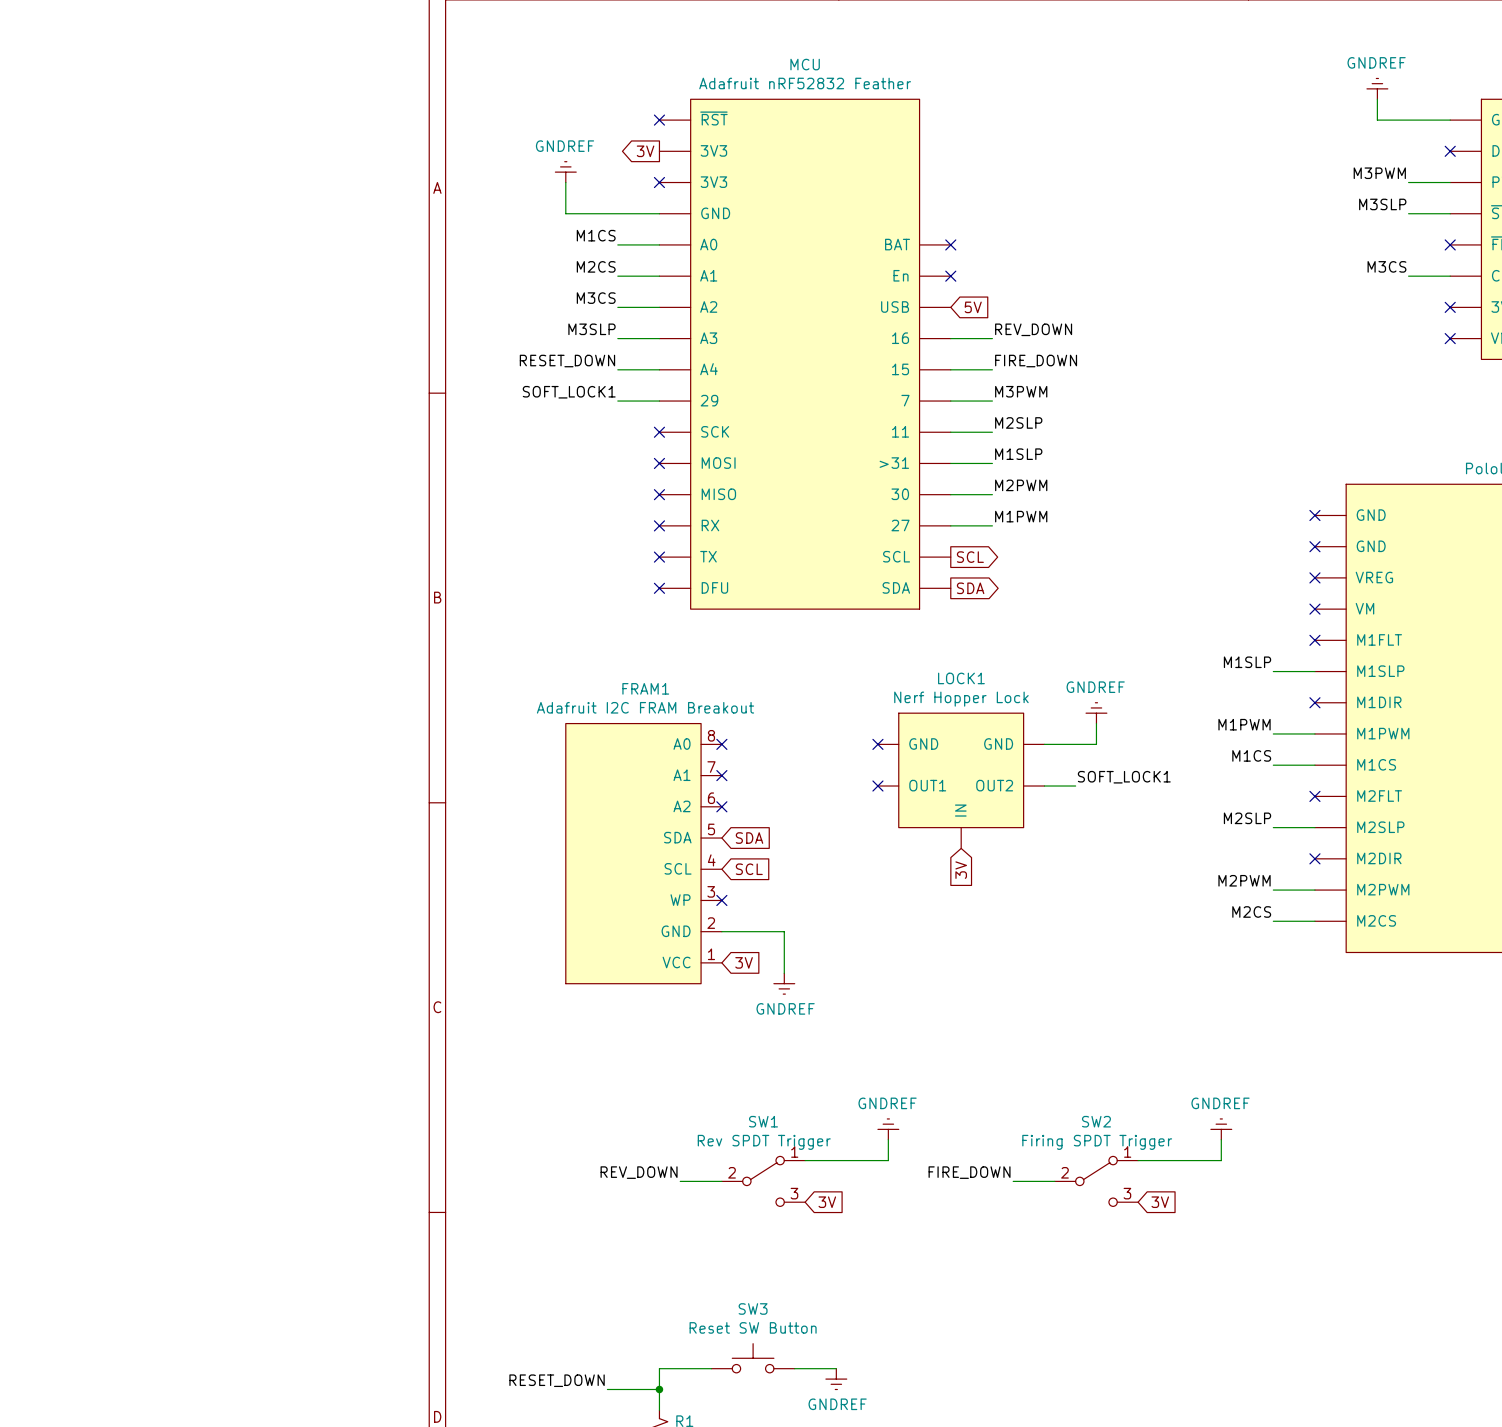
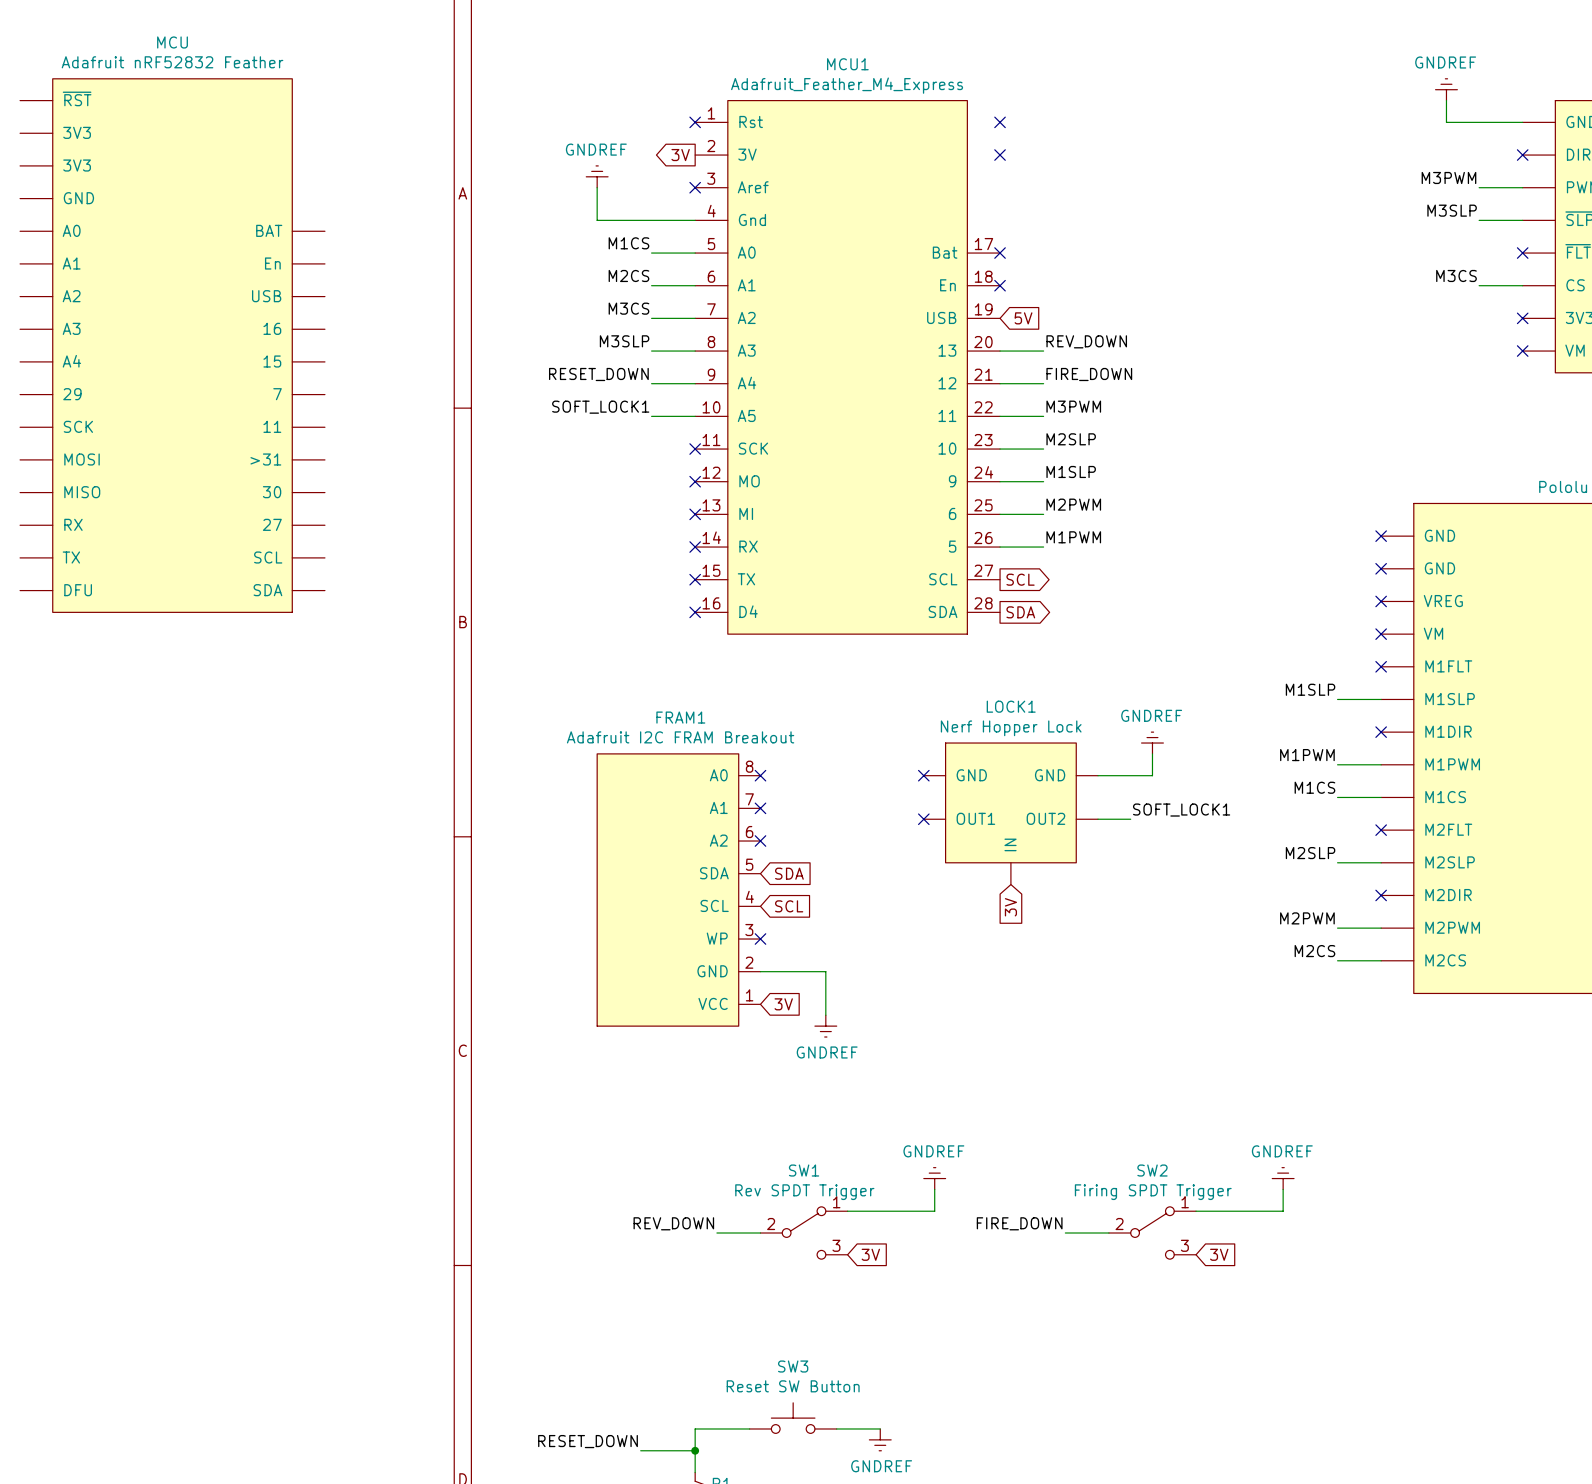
MCU name: MCU (805, 64) -> MCU1 (847, 64)
MCU value: Adafruit nRF52832 Feather (805, 83) -> Adafruit_Feather_M4_Express (847, 85)
MCU symbol: [659, 99, 951, 610] -> [695, 100, 1001, 635]
no-connect mark: none -> (1000, 122)
no-connect mark: none -> (1000, 155)
MCU: none -> Adafruit nRF52832 Feather (172, 345)

